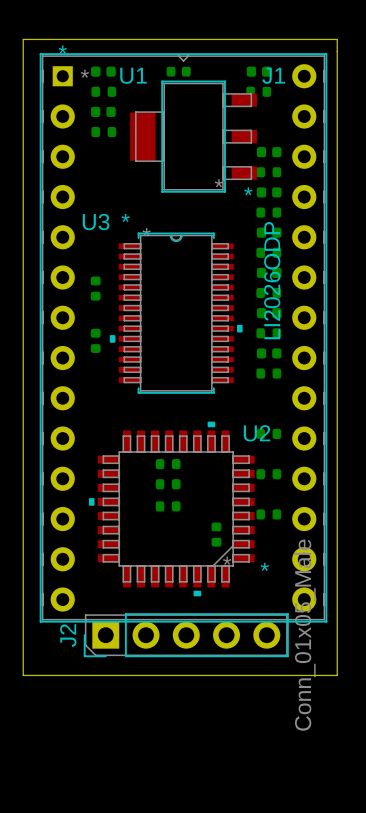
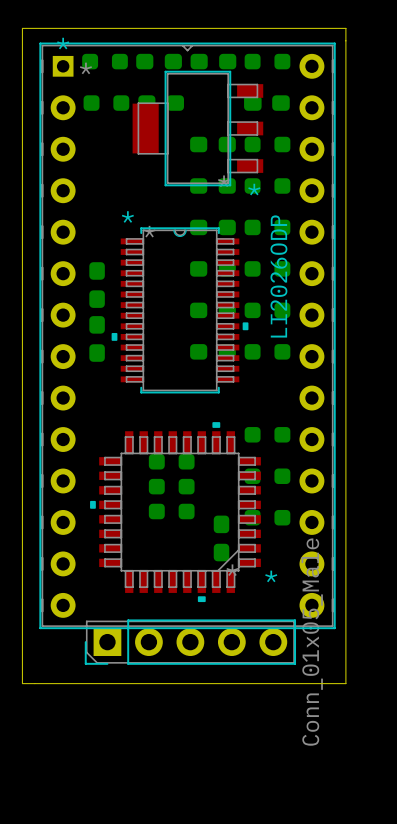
part footprint: [91, 66, 116, 77] -> [82, 53, 128, 70]
part footprint: [246, 66, 272, 77] -> [244, 53, 291, 70]
part: none -> (159, 61)
part: (178, 71) -> none
part: none -> (213, 61)
U1 name: U1 (133, 75) -> none
J1 name: J1 (273, 75) -> none
part: (103, 91) -> none
part: (258, 91) -> none
part footprint: [91, 106, 116, 117] -> [83, 95, 130, 111]
part: none -> (161, 103)
part: none -> (266, 103)
part: (103, 132) -> none
part footprint: [256, 147, 282, 158] -> [244, 136, 291, 153]
part: none -> (212, 144)
part: (268, 172) -> none
part footprint: [256, 187, 282, 198] -> [244, 178, 291, 194]
part: none -> (212, 185)
part: (268, 212) -> none
U3 name: U3 (96, 222) -> none
part footprint: [256, 227, 282, 238] -> [244, 219, 291, 236]
part: none -> (212, 227)
part: (268, 252) -> none
part footprint: [256, 267, 282, 278] -> [244, 261, 291, 277]
part: none -> (212, 268)
part footprint: [90, 276, 101, 301] -> [89, 262, 105, 308]
part: (268, 293) -> none
part footprint: [256, 308, 282, 319] -> [244, 302, 291, 319]
part: none -> (212, 310)
part footprint: [90, 328, 101, 353] -> [89, 316, 105, 362]
part: (268, 333) -> none
part footprint: [256, 348, 282, 359] -> [244, 344, 291, 360]
part: none -> (212, 351)
part: (268, 373) -> none
part footprint: [256, 428, 282, 440] -> [244, 427, 291, 443]
U2 name: U2 (257, 433) -> none
part footprint: [155, 459, 181, 470] -> [148, 453, 195, 470]
part footprint: [256, 469, 282, 480] -> [244, 468, 291, 485]
part footprint: [155, 479, 181, 490] -> [148, 478, 195, 495]
part footprint: [155, 501, 181, 512] -> [148, 503, 195, 520]
part footprint: [256, 509, 282, 520] -> [244, 509, 291, 526]
part footprint: [211, 522, 222, 547] -> [213, 515, 230, 562]
J2 name: J2 (68, 635) -> none

